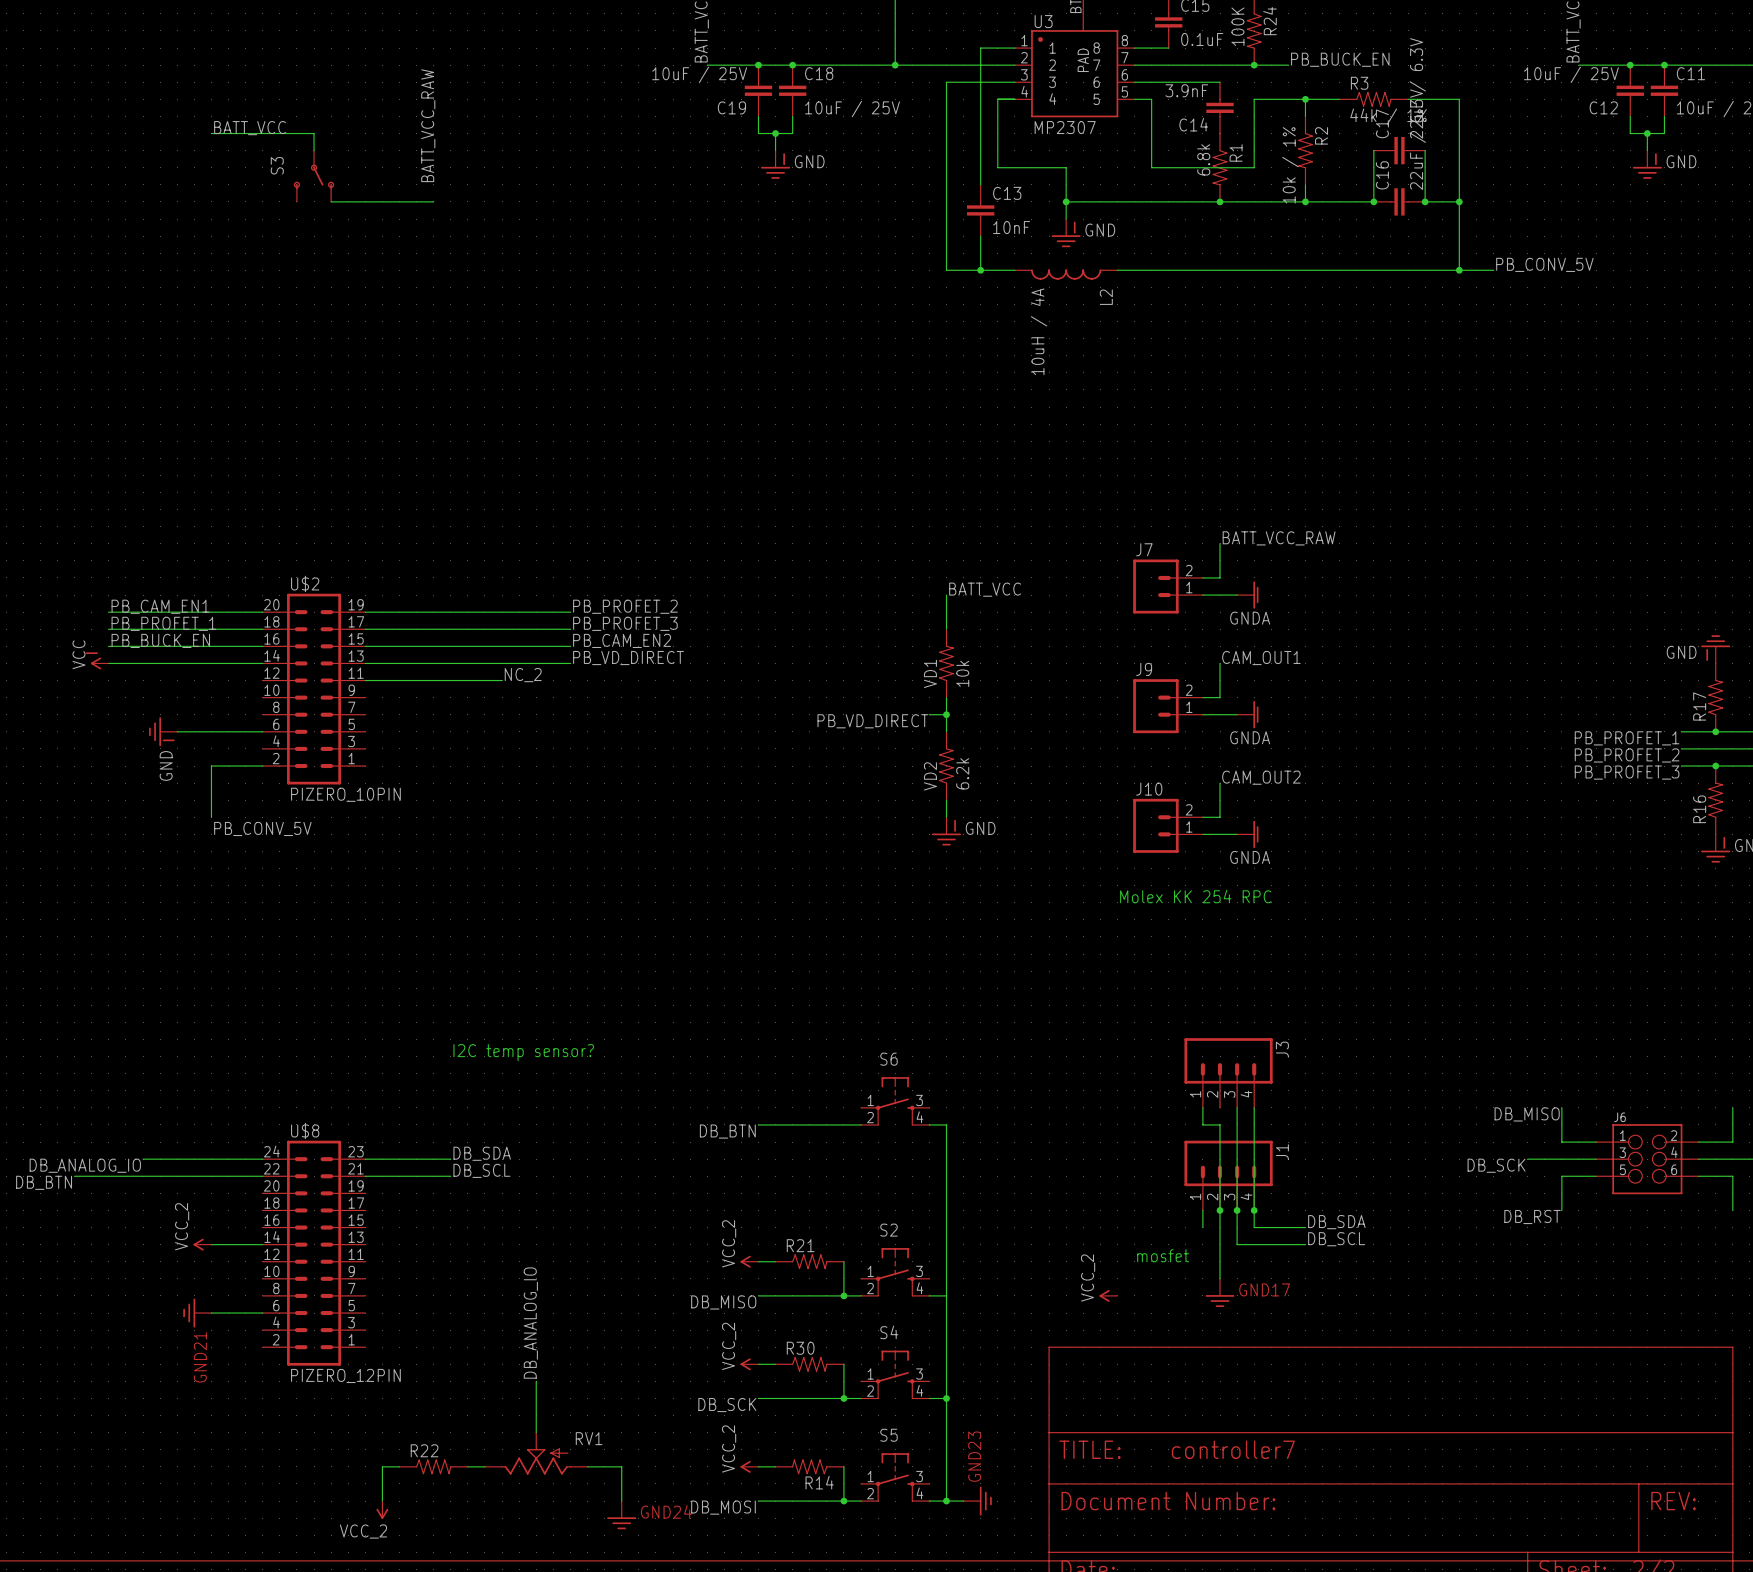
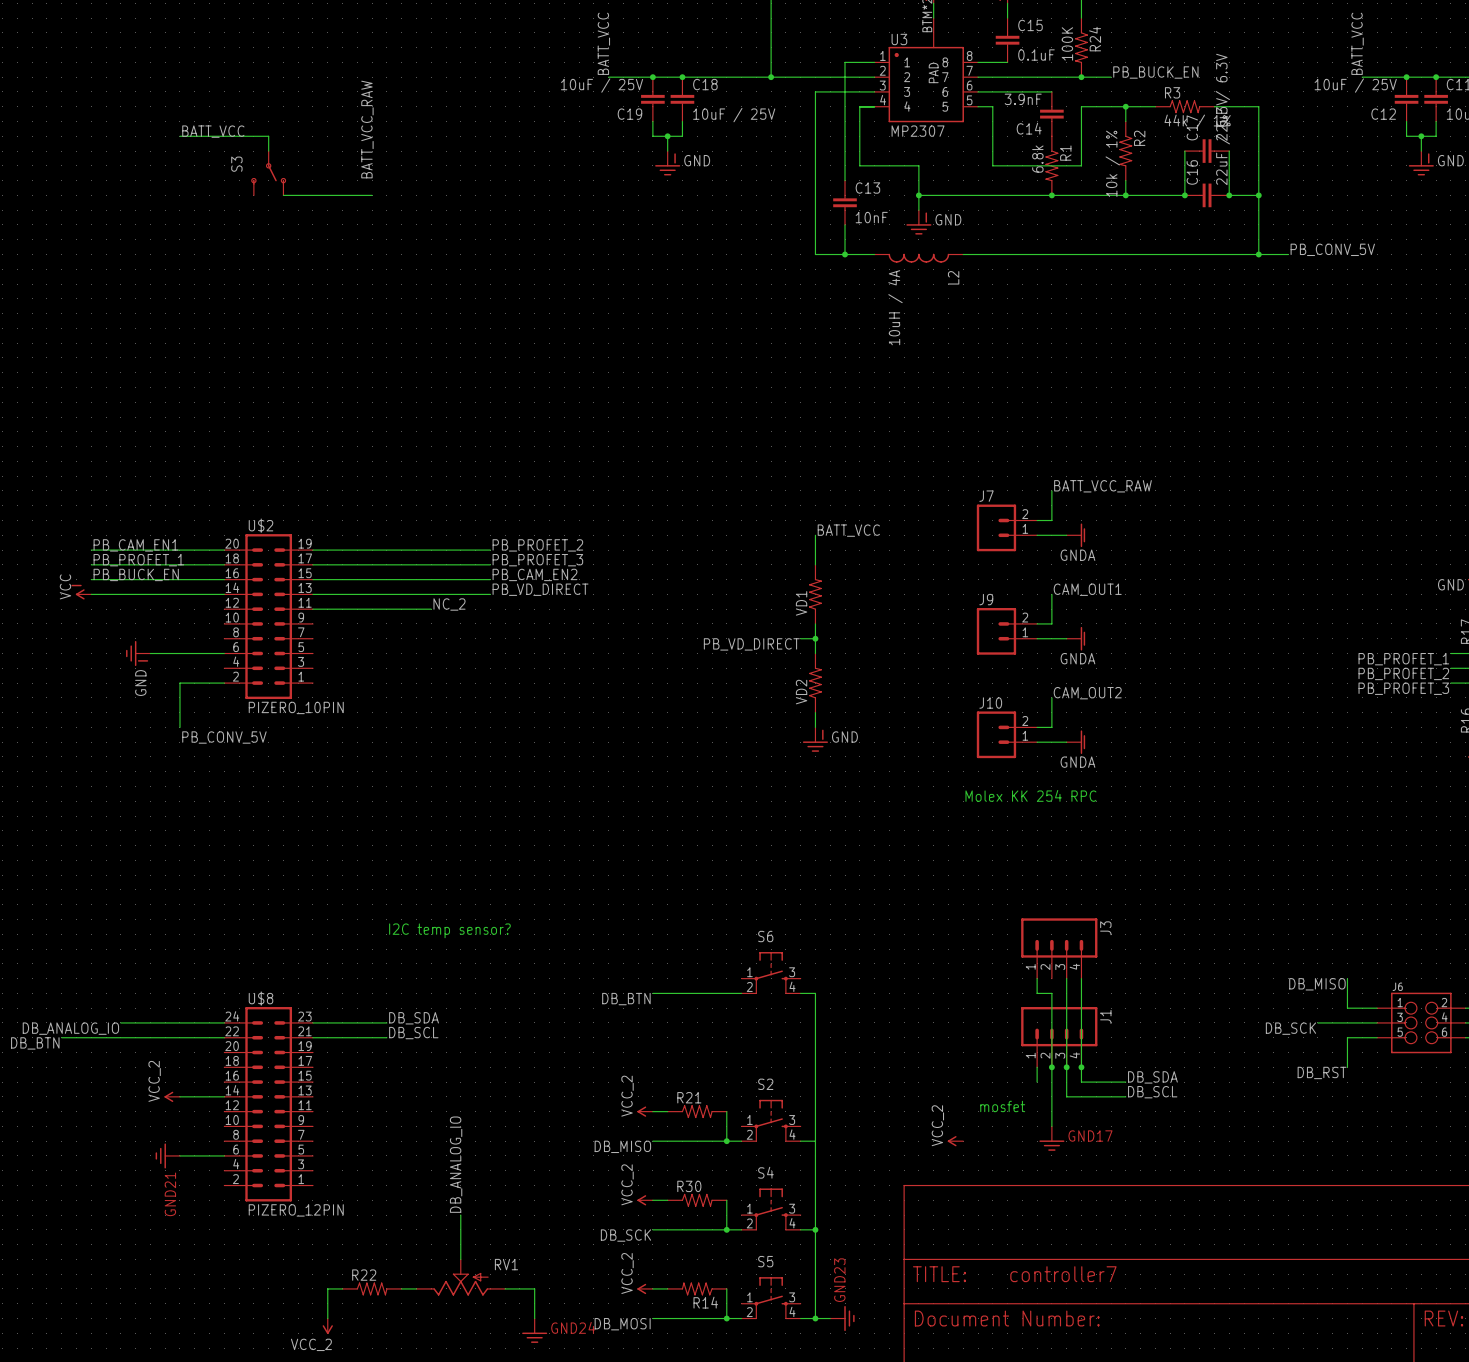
VD1 value: 10k (962, 673) -> none
VD2 value: 6.2k (962, 773) -> none

